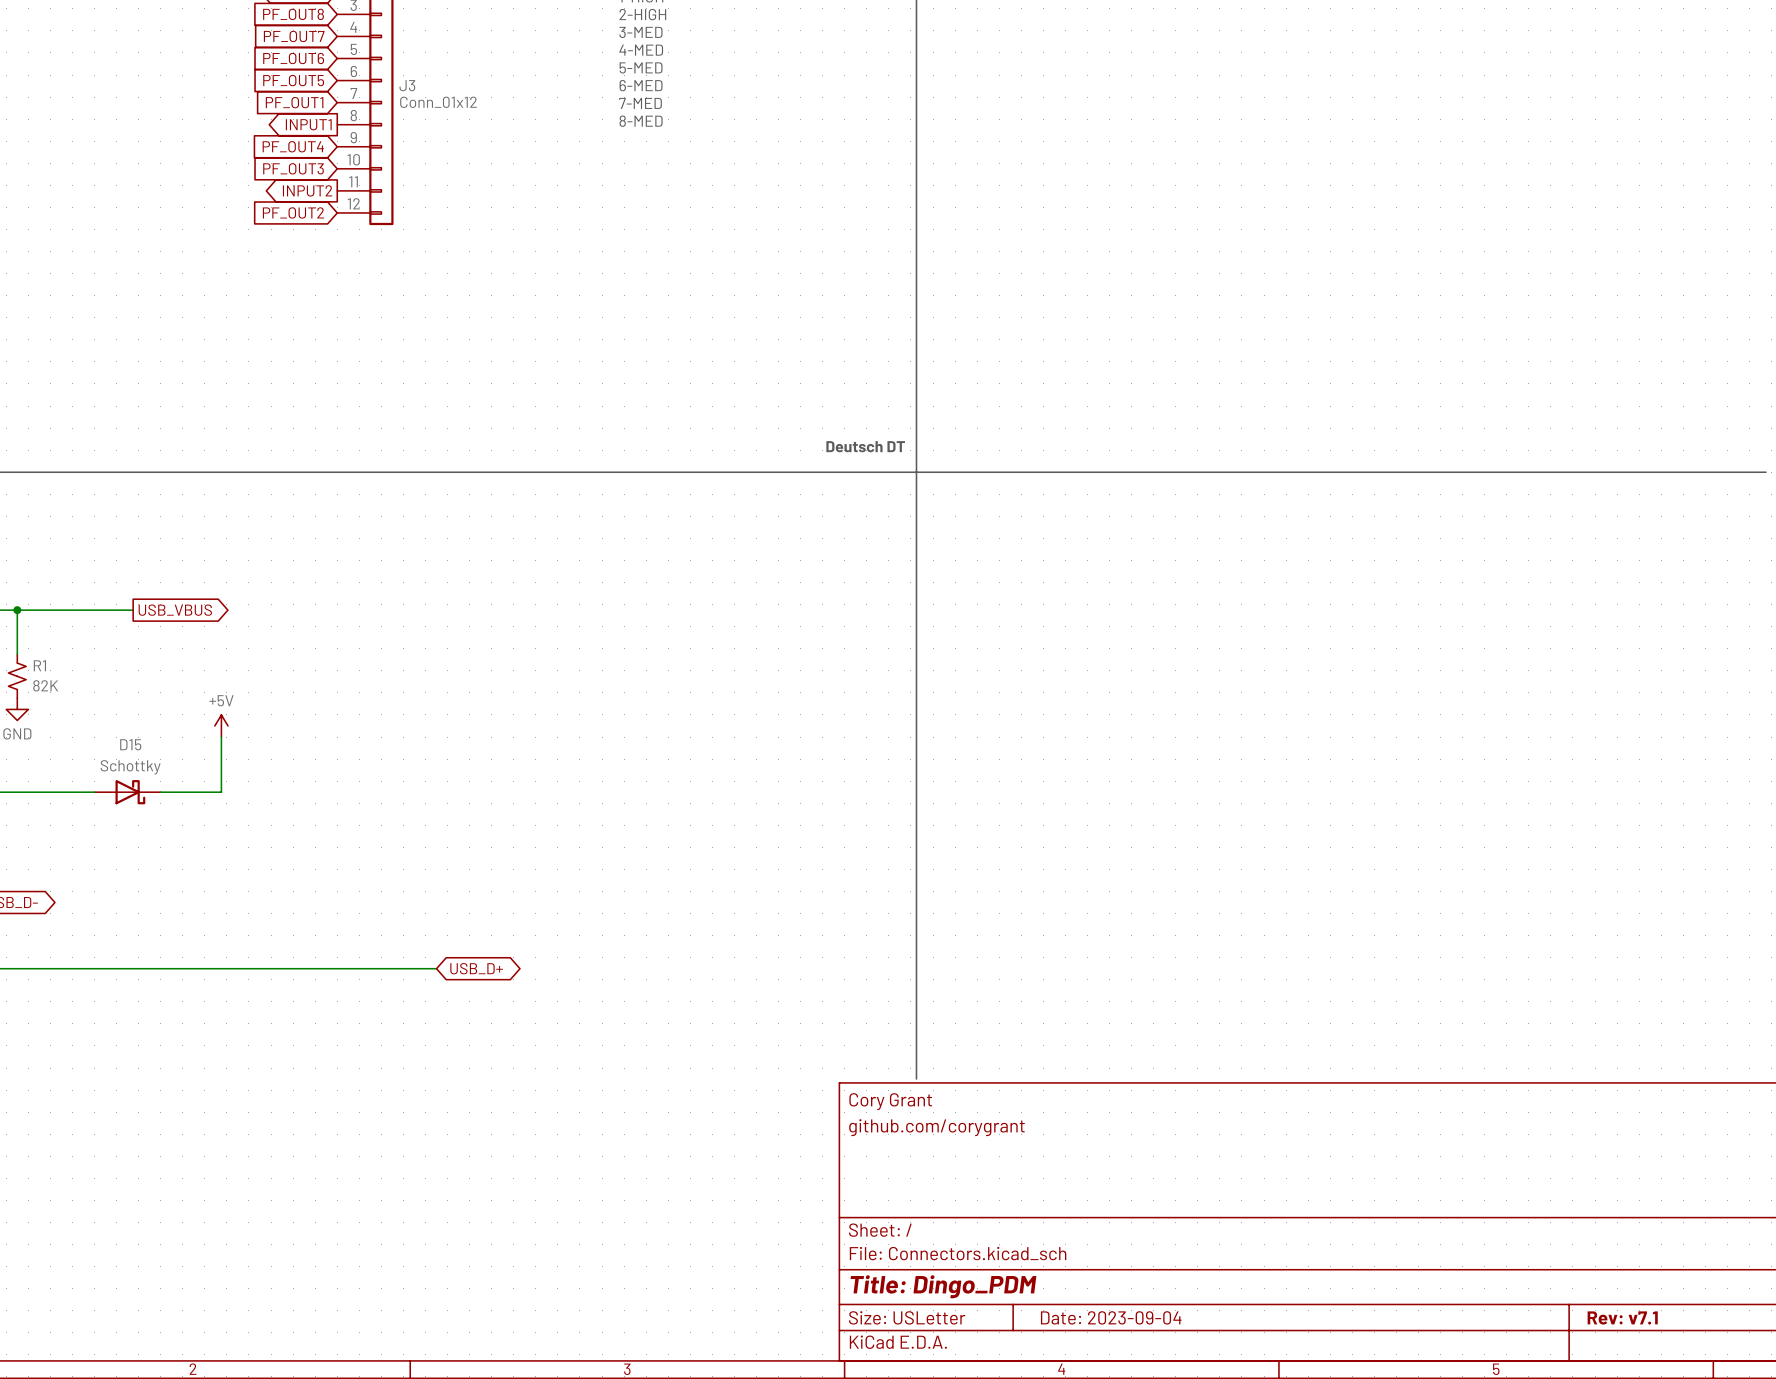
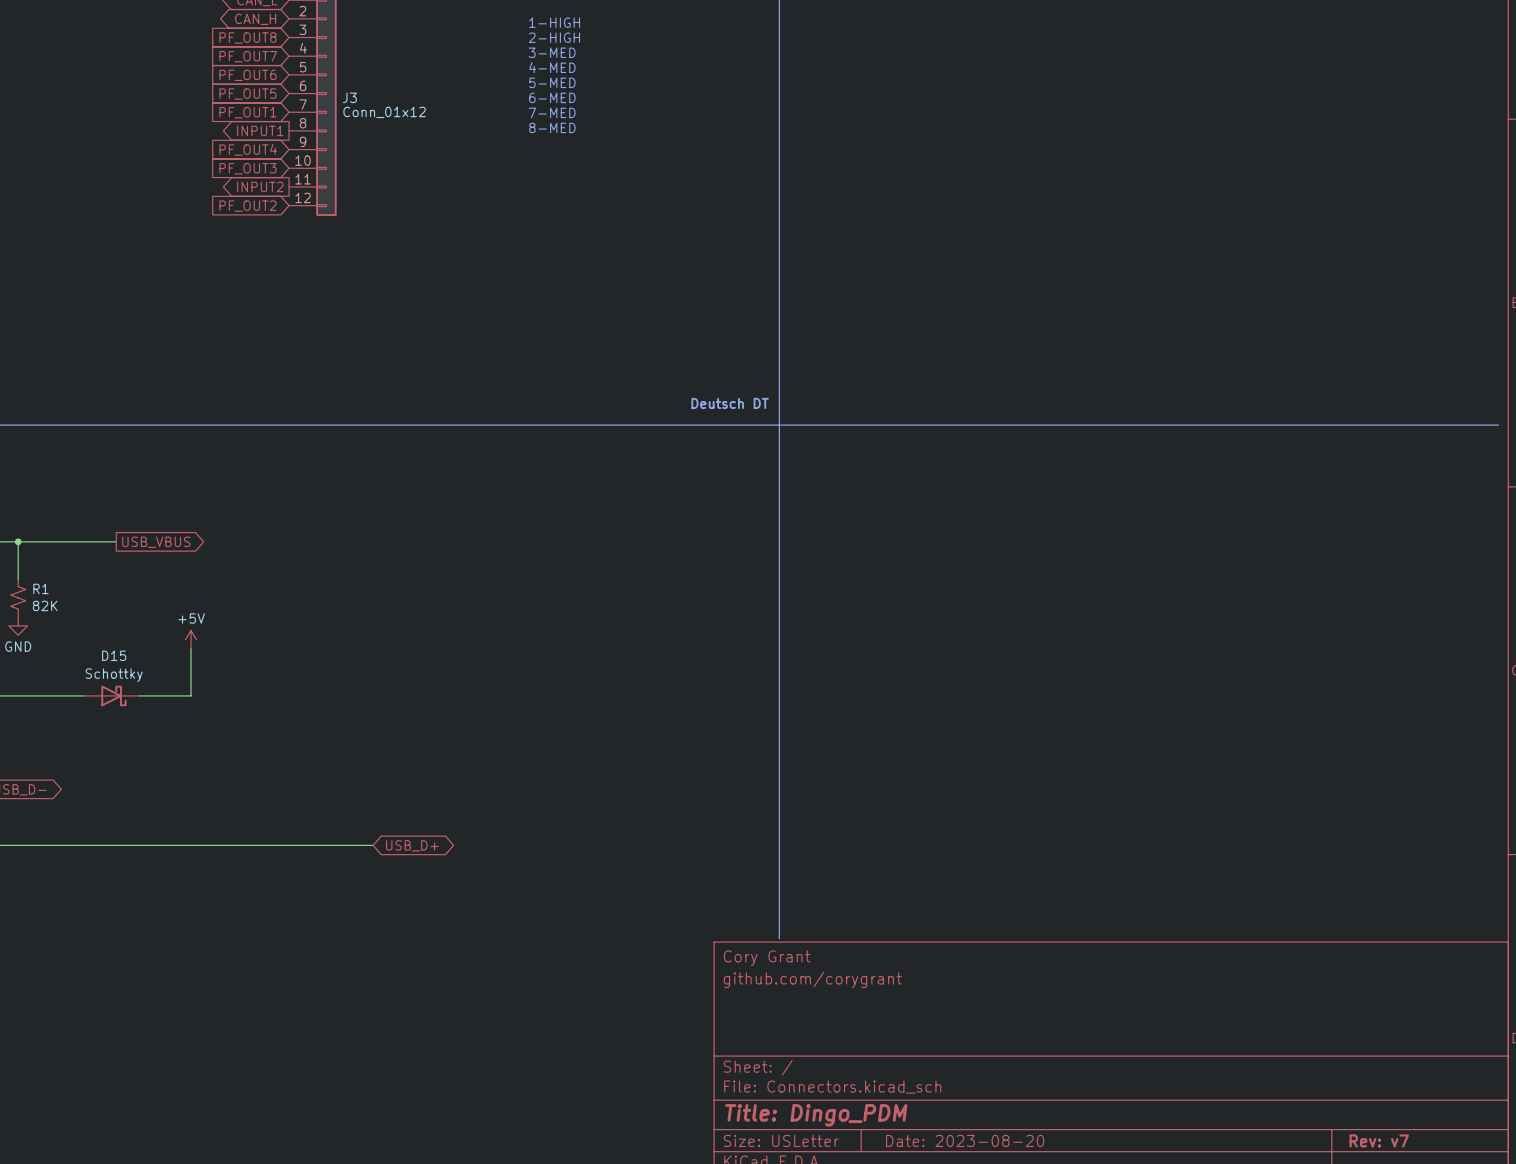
title block: Date: 2023-09-04 (1111, 1317) -> Date: 2023-08-20 (965, 1140)
title block: Rev: v7.1 (1622, 1317) -> Rev: v7 (1379, 1140)

